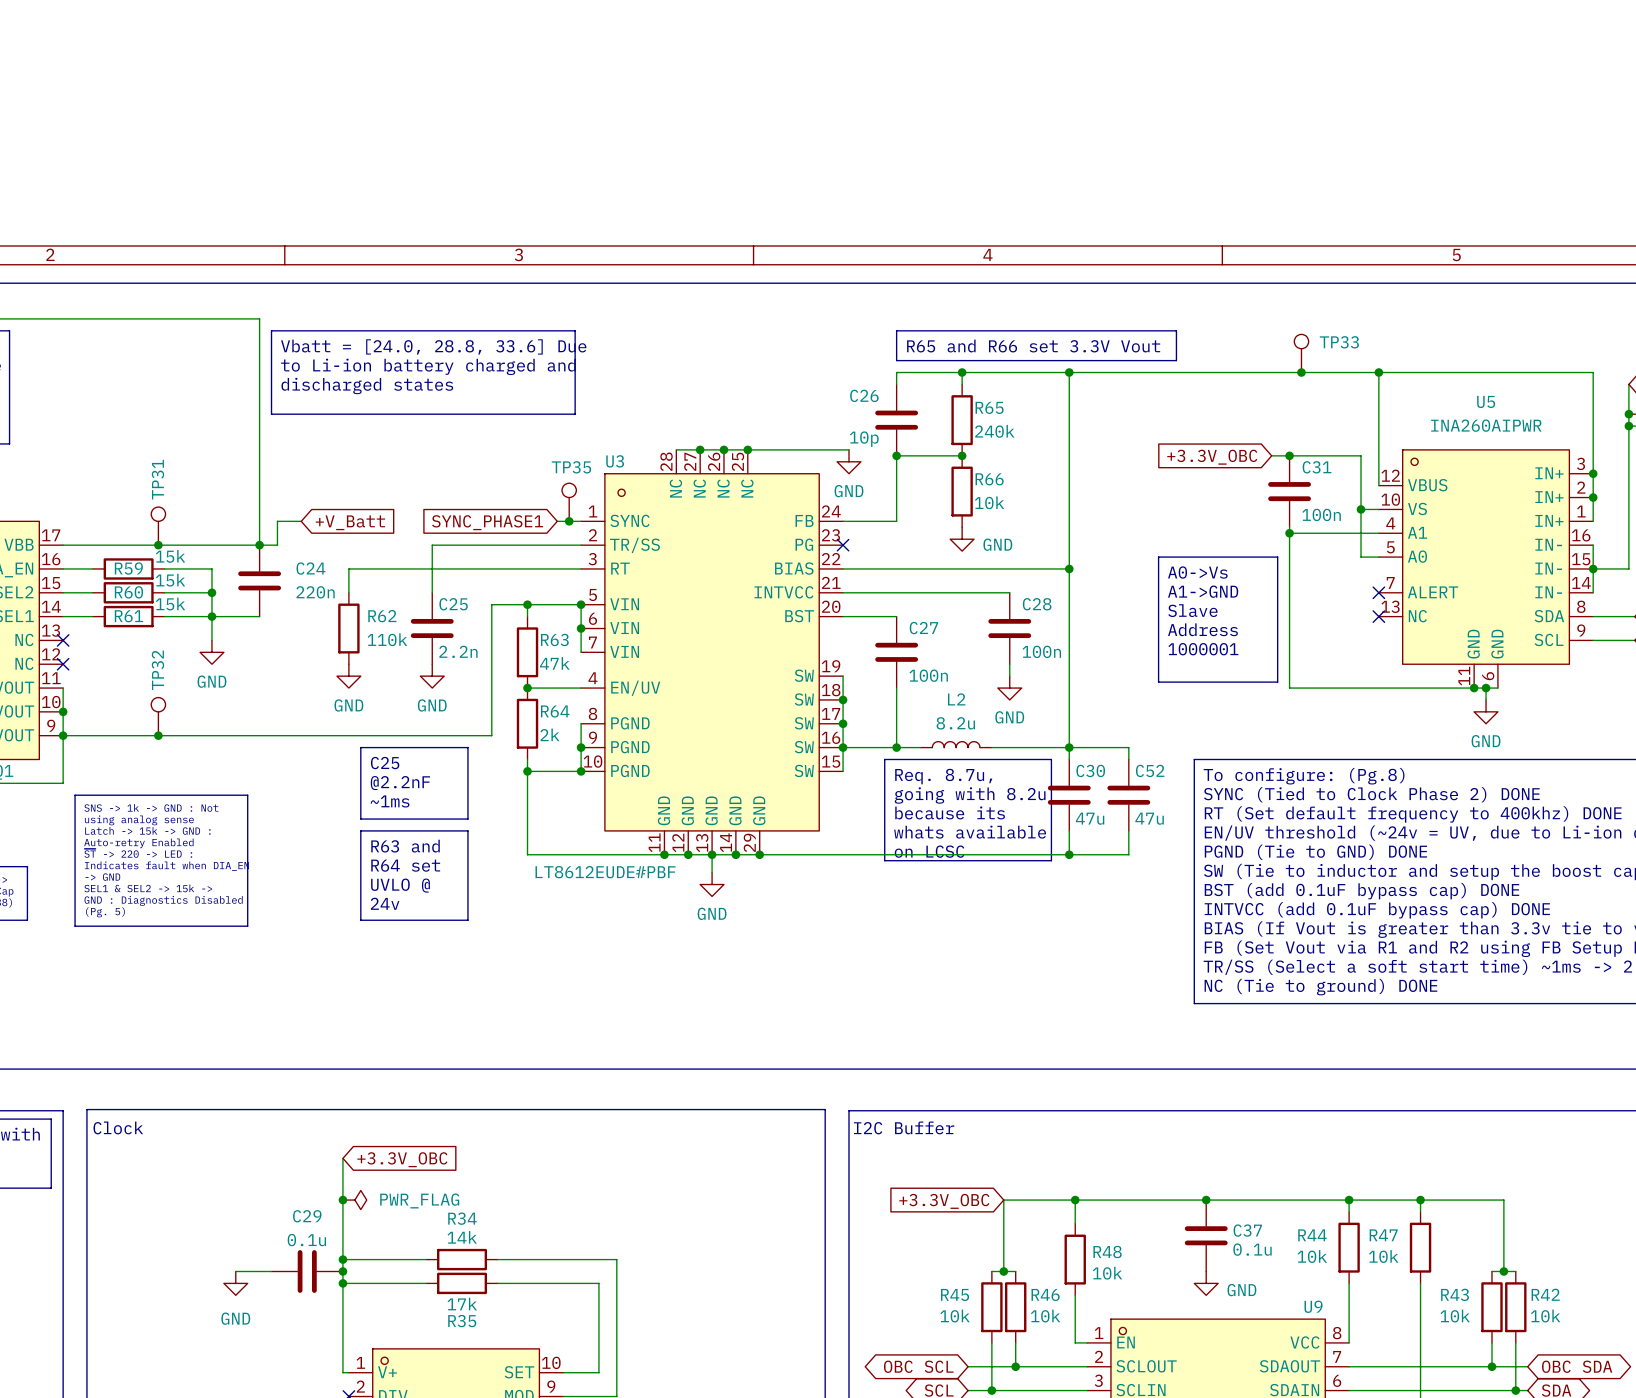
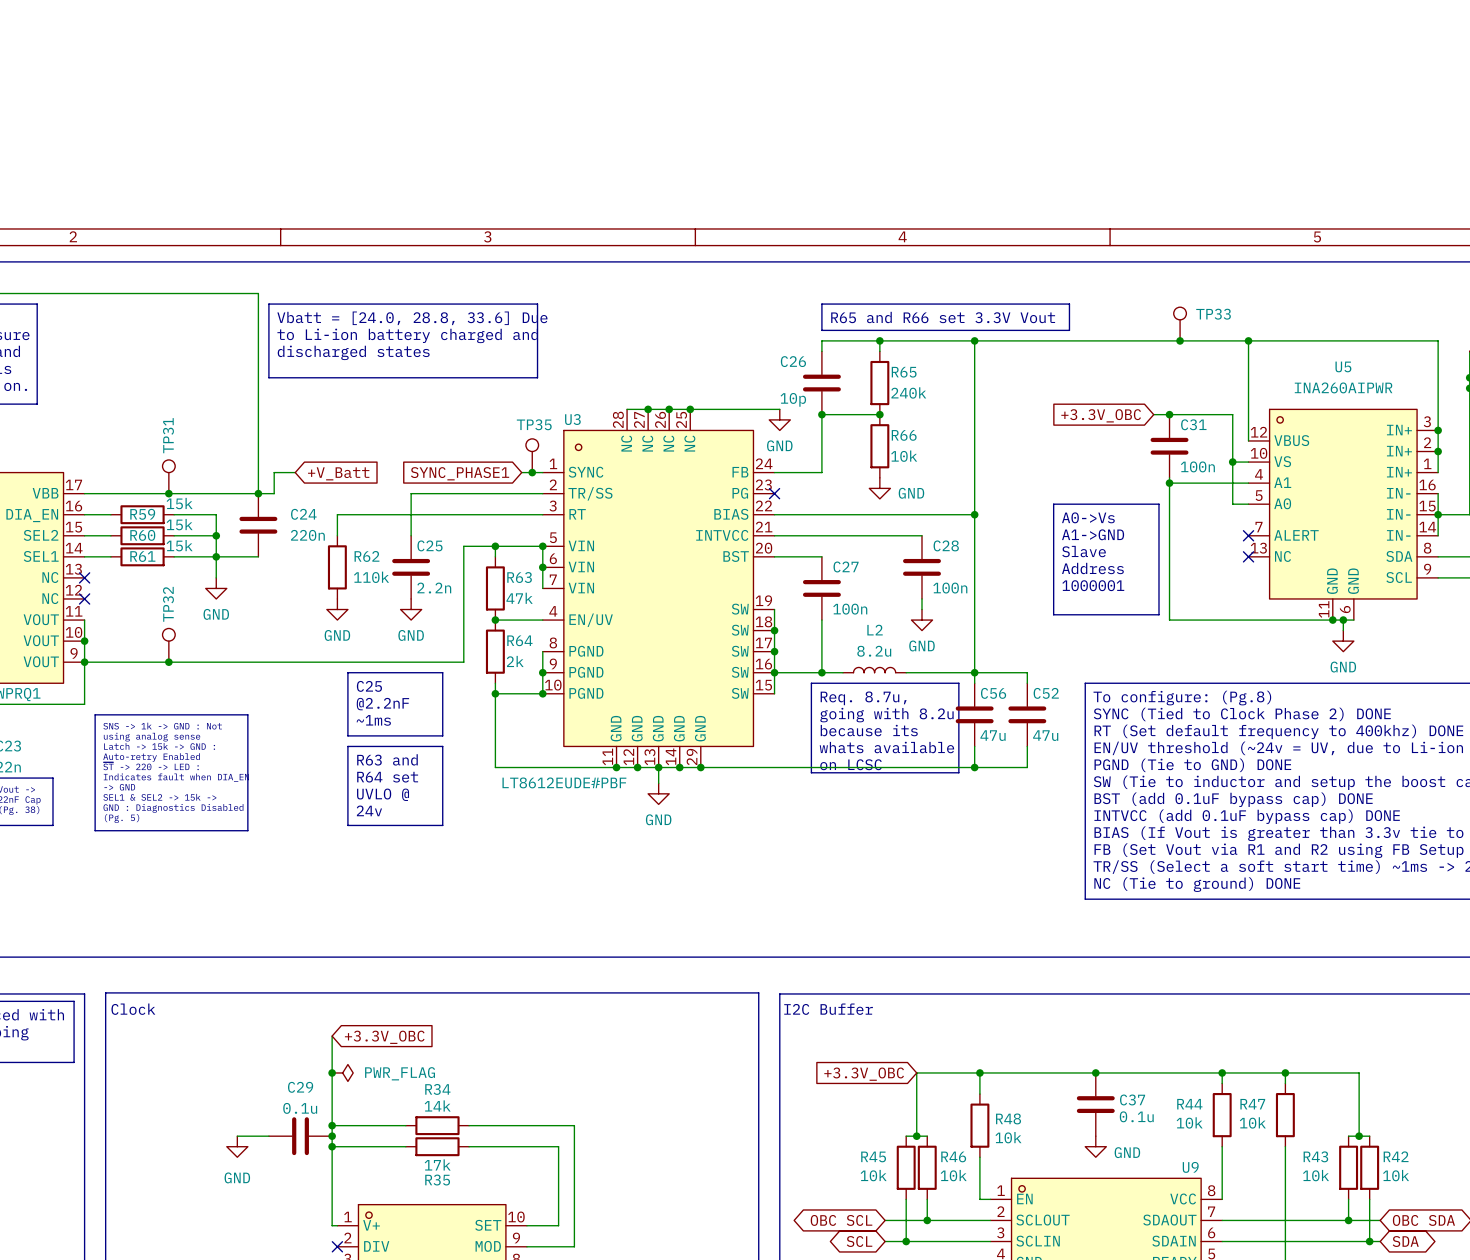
C30 name: C30 (1090, 770) -> C56 (993, 693)

